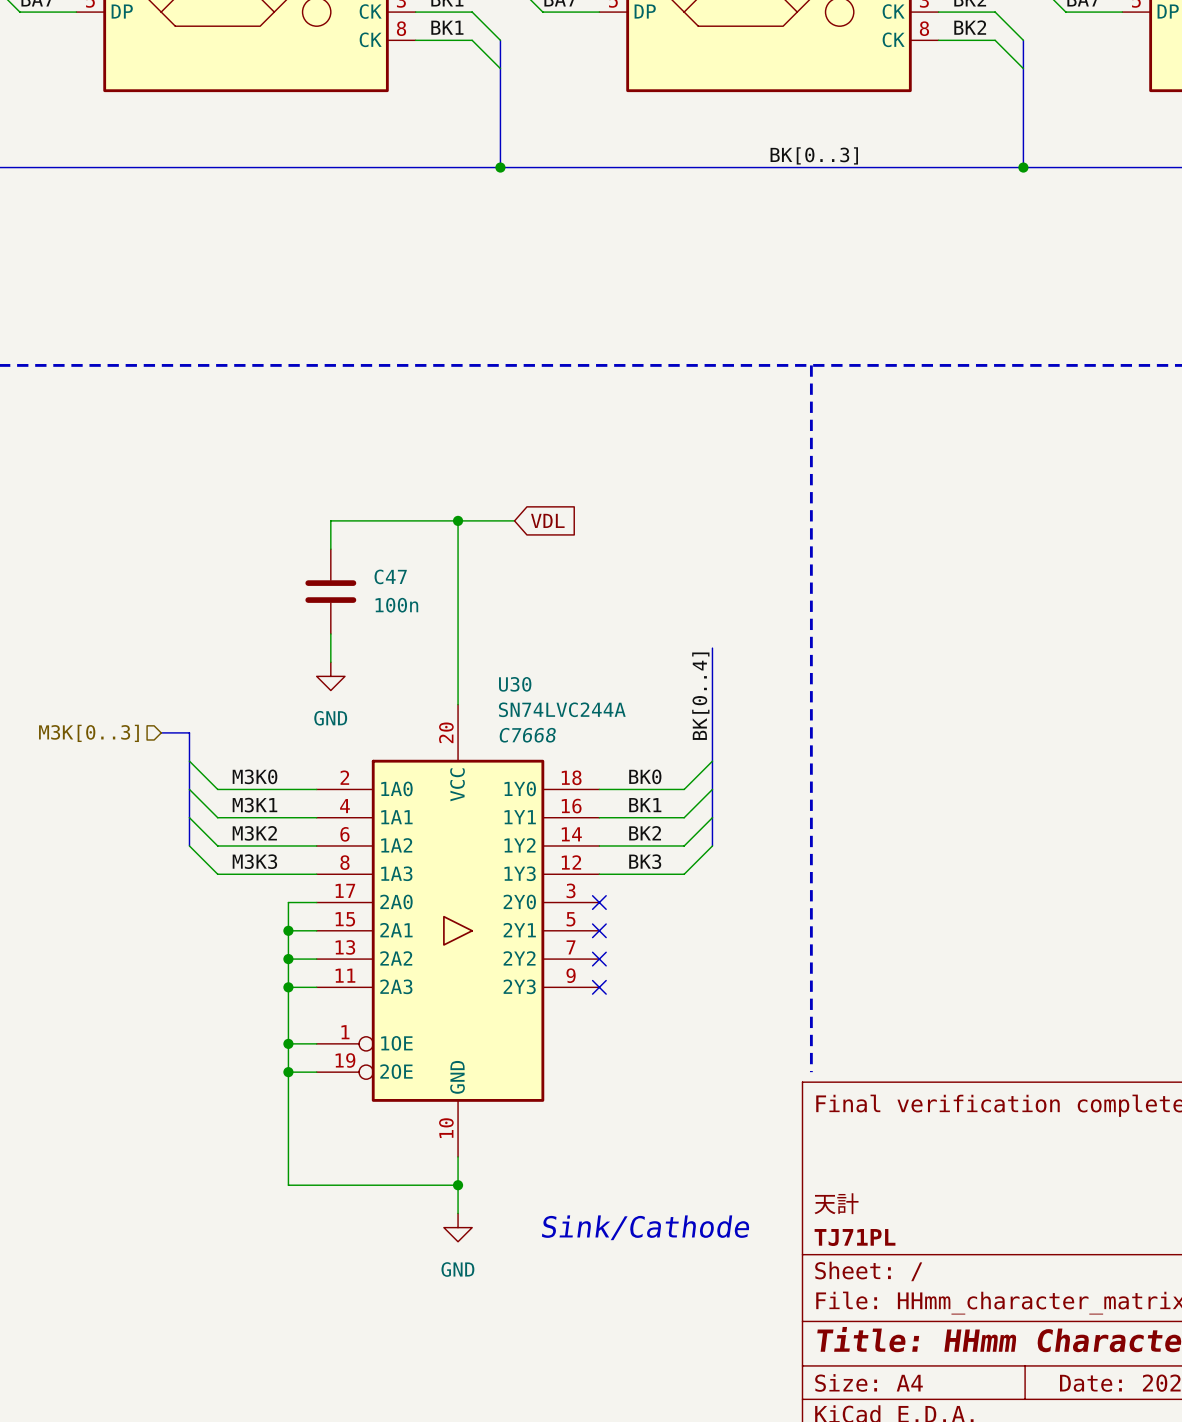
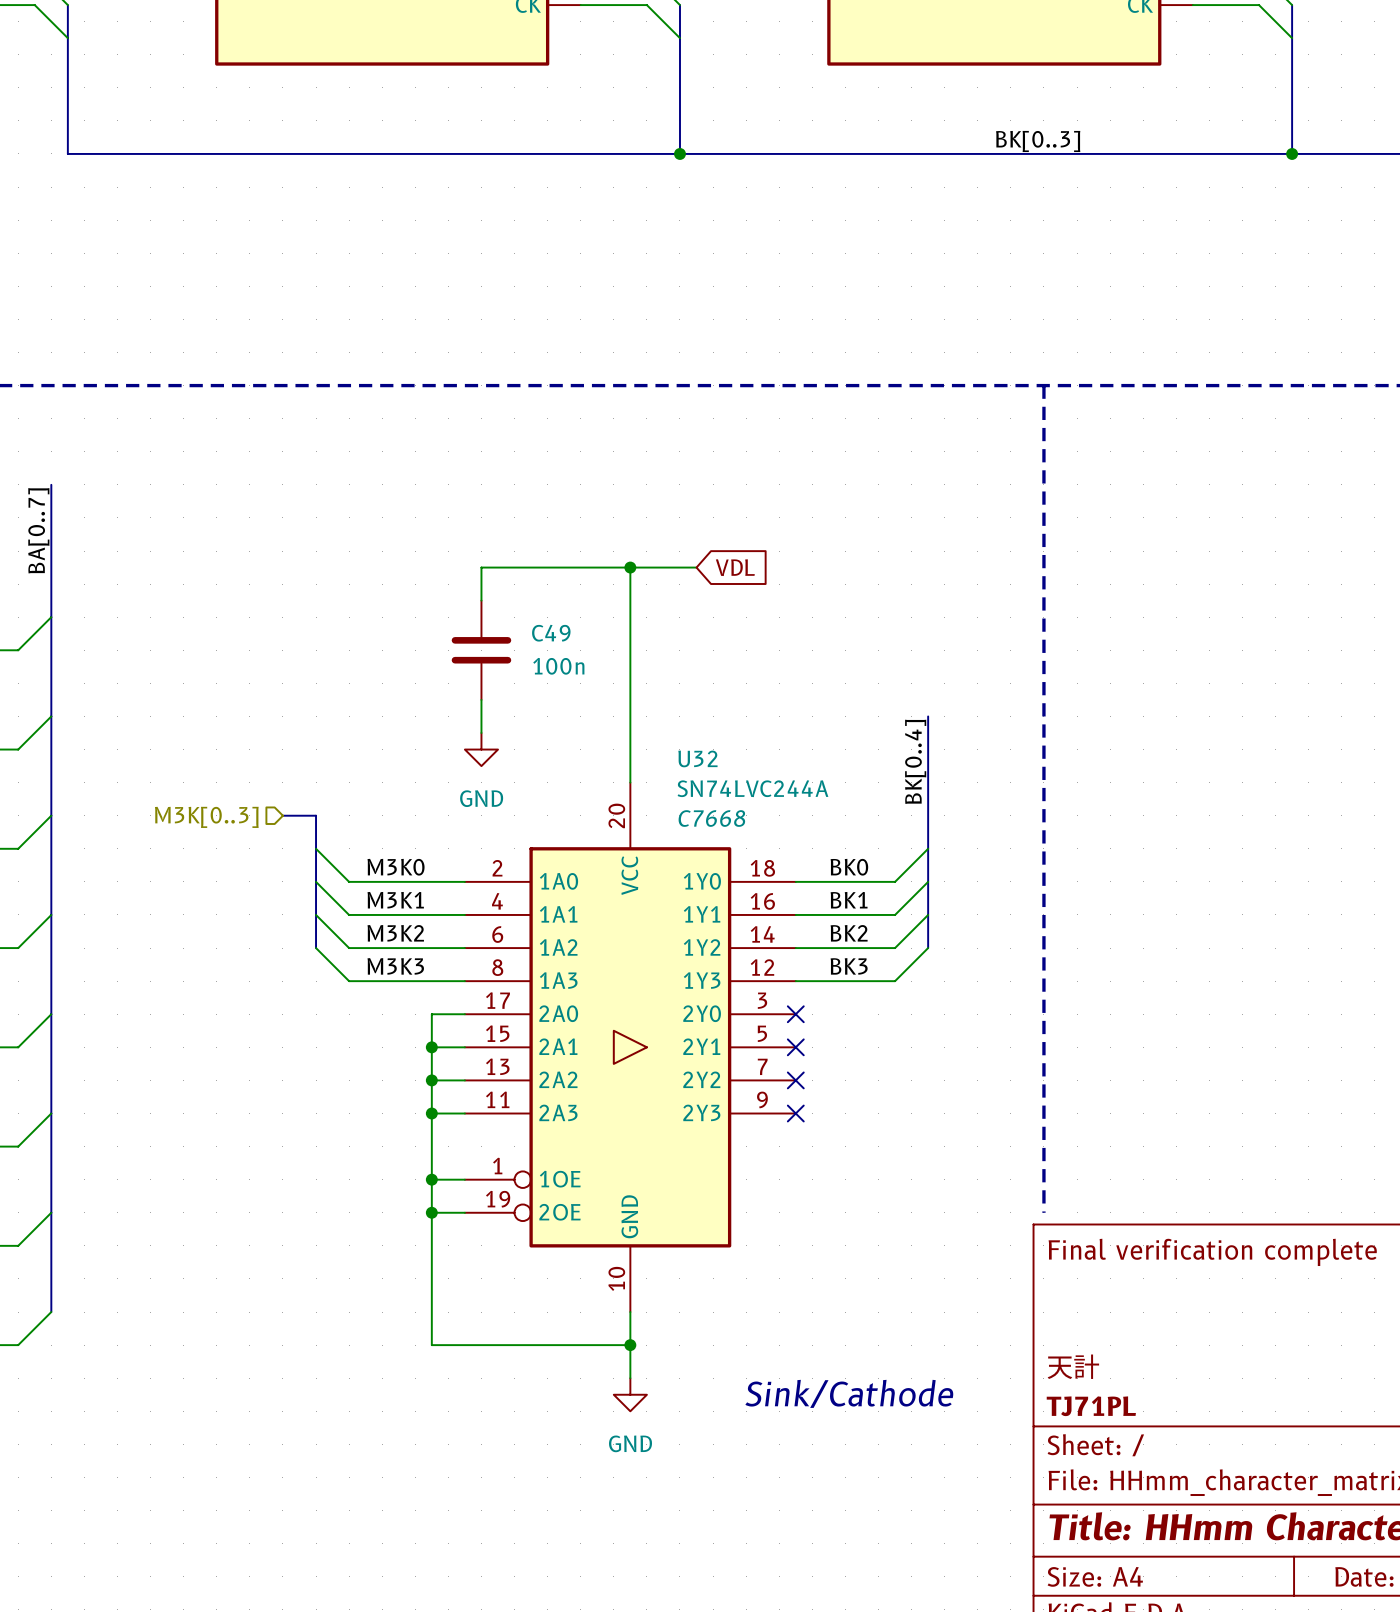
C47 name: C47 (390, 576) -> C49 (551, 633)
U30 name: U30 (515, 684) -> U32 (697, 758)

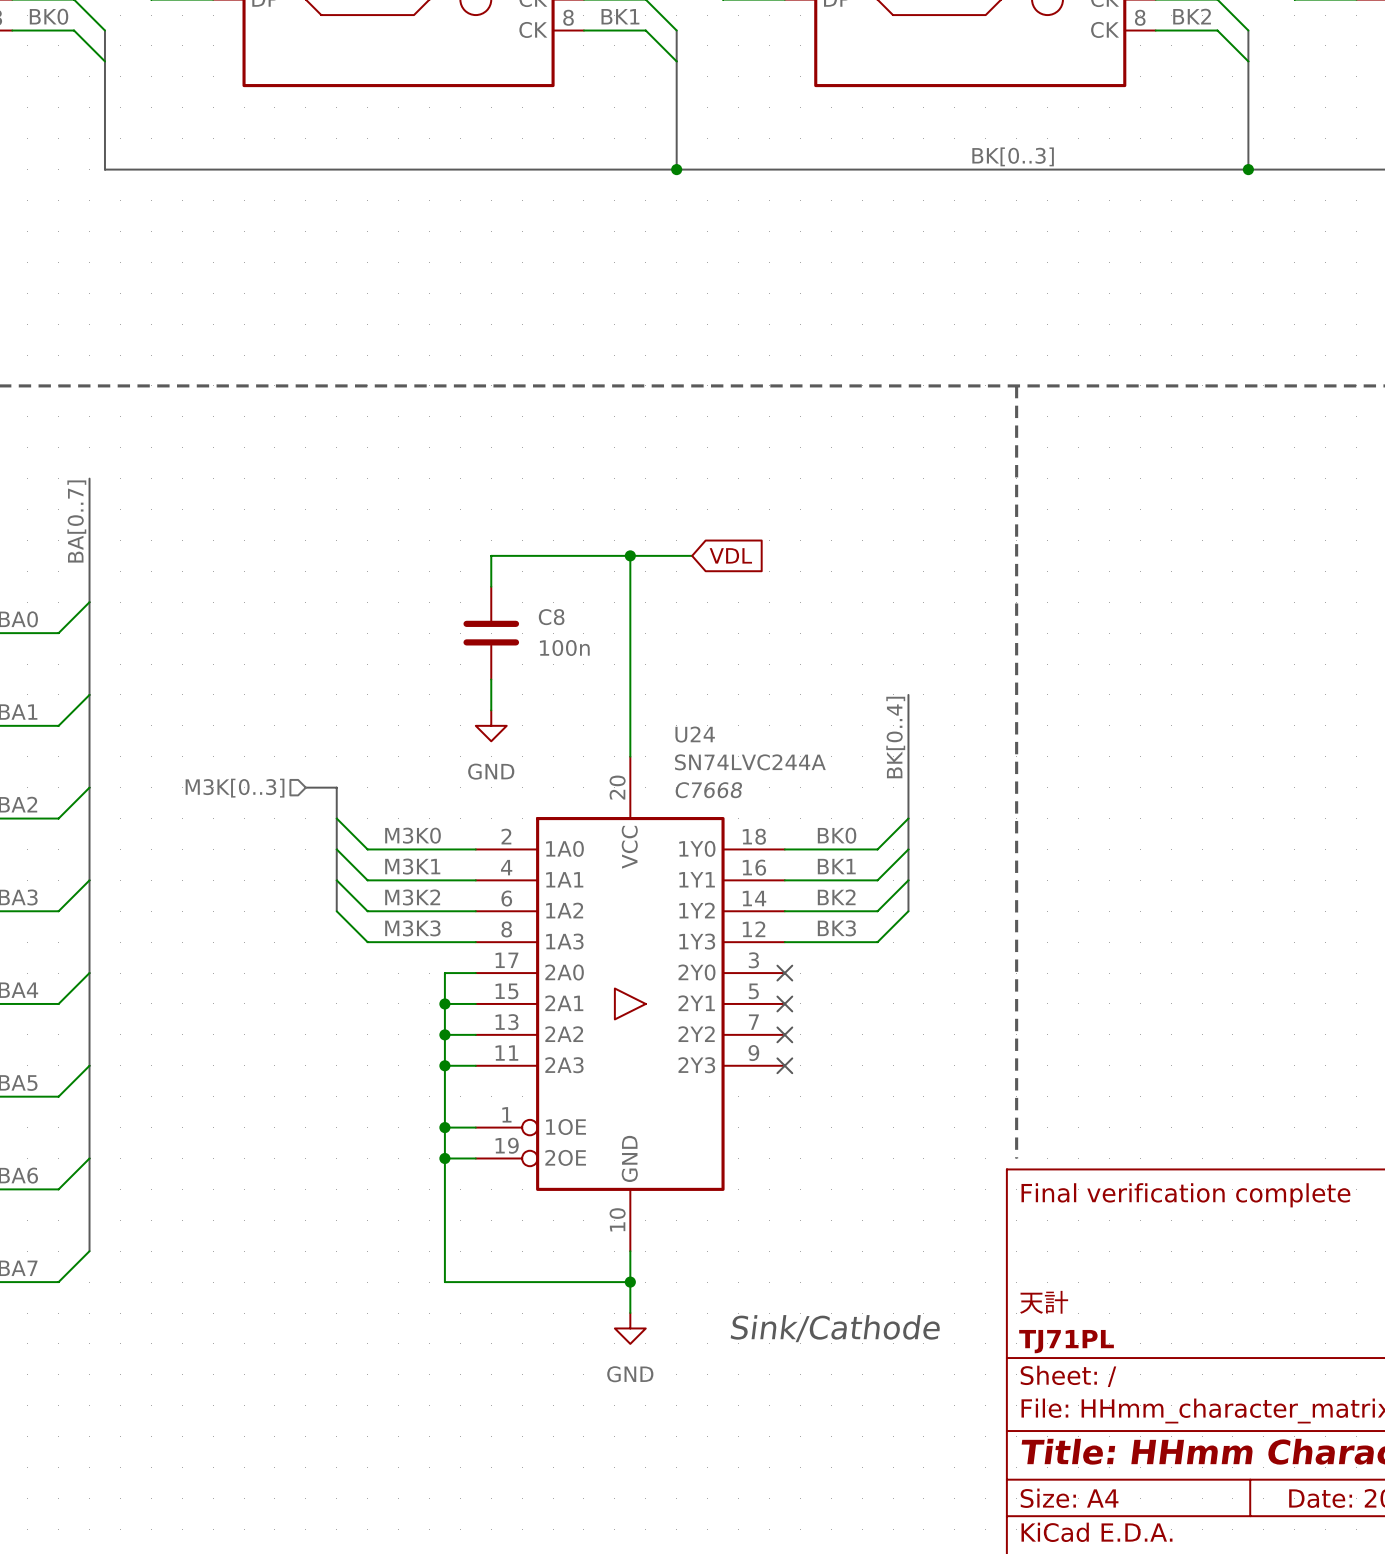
C49 name: C49 (551, 633) -> C8 (551, 617)
U32 name: U32 (697, 758) -> U24 (695, 734)

